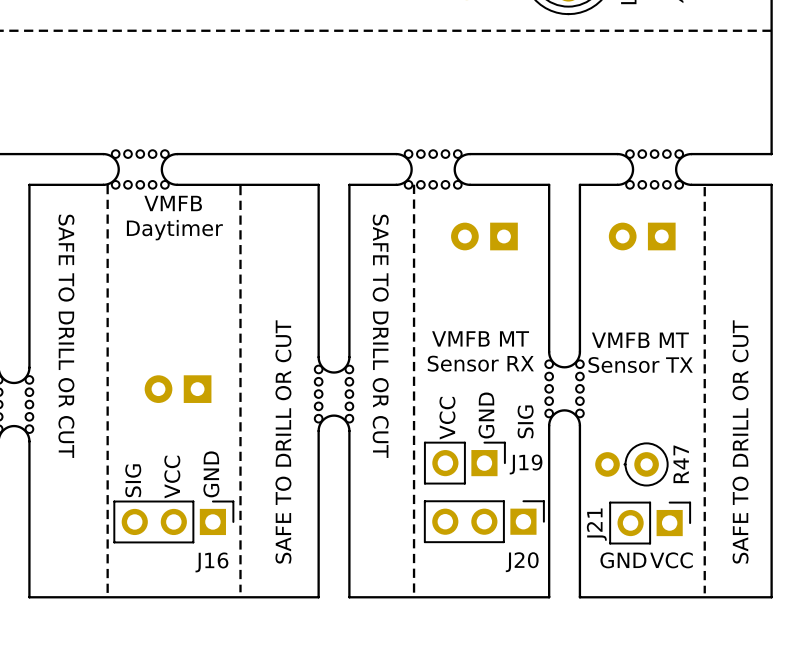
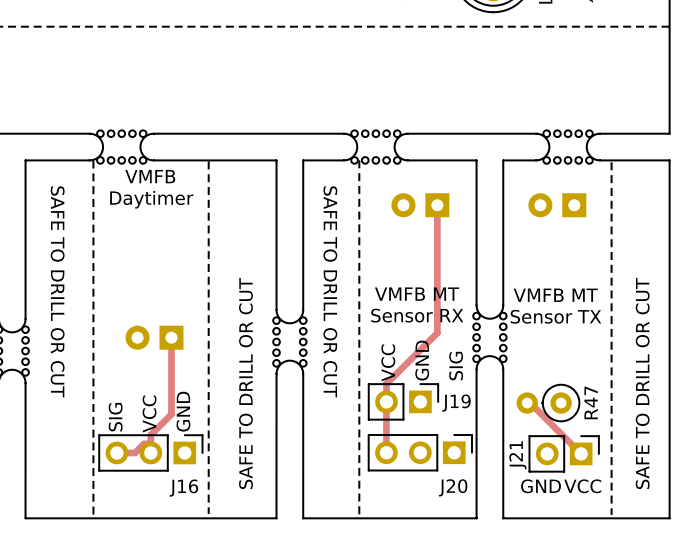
track: none -> (437, 205) (437, 333) (386, 383) (386, 401)
track: none -> (171, 337) (171, 414) (150, 434) (150, 452)
track: none -> (386, 392) (386, 452)
track: none -> (527, 403) (530, 403) (581, 453)
track: none -> (150, 443) (143, 443) (134, 452) (116, 452)

